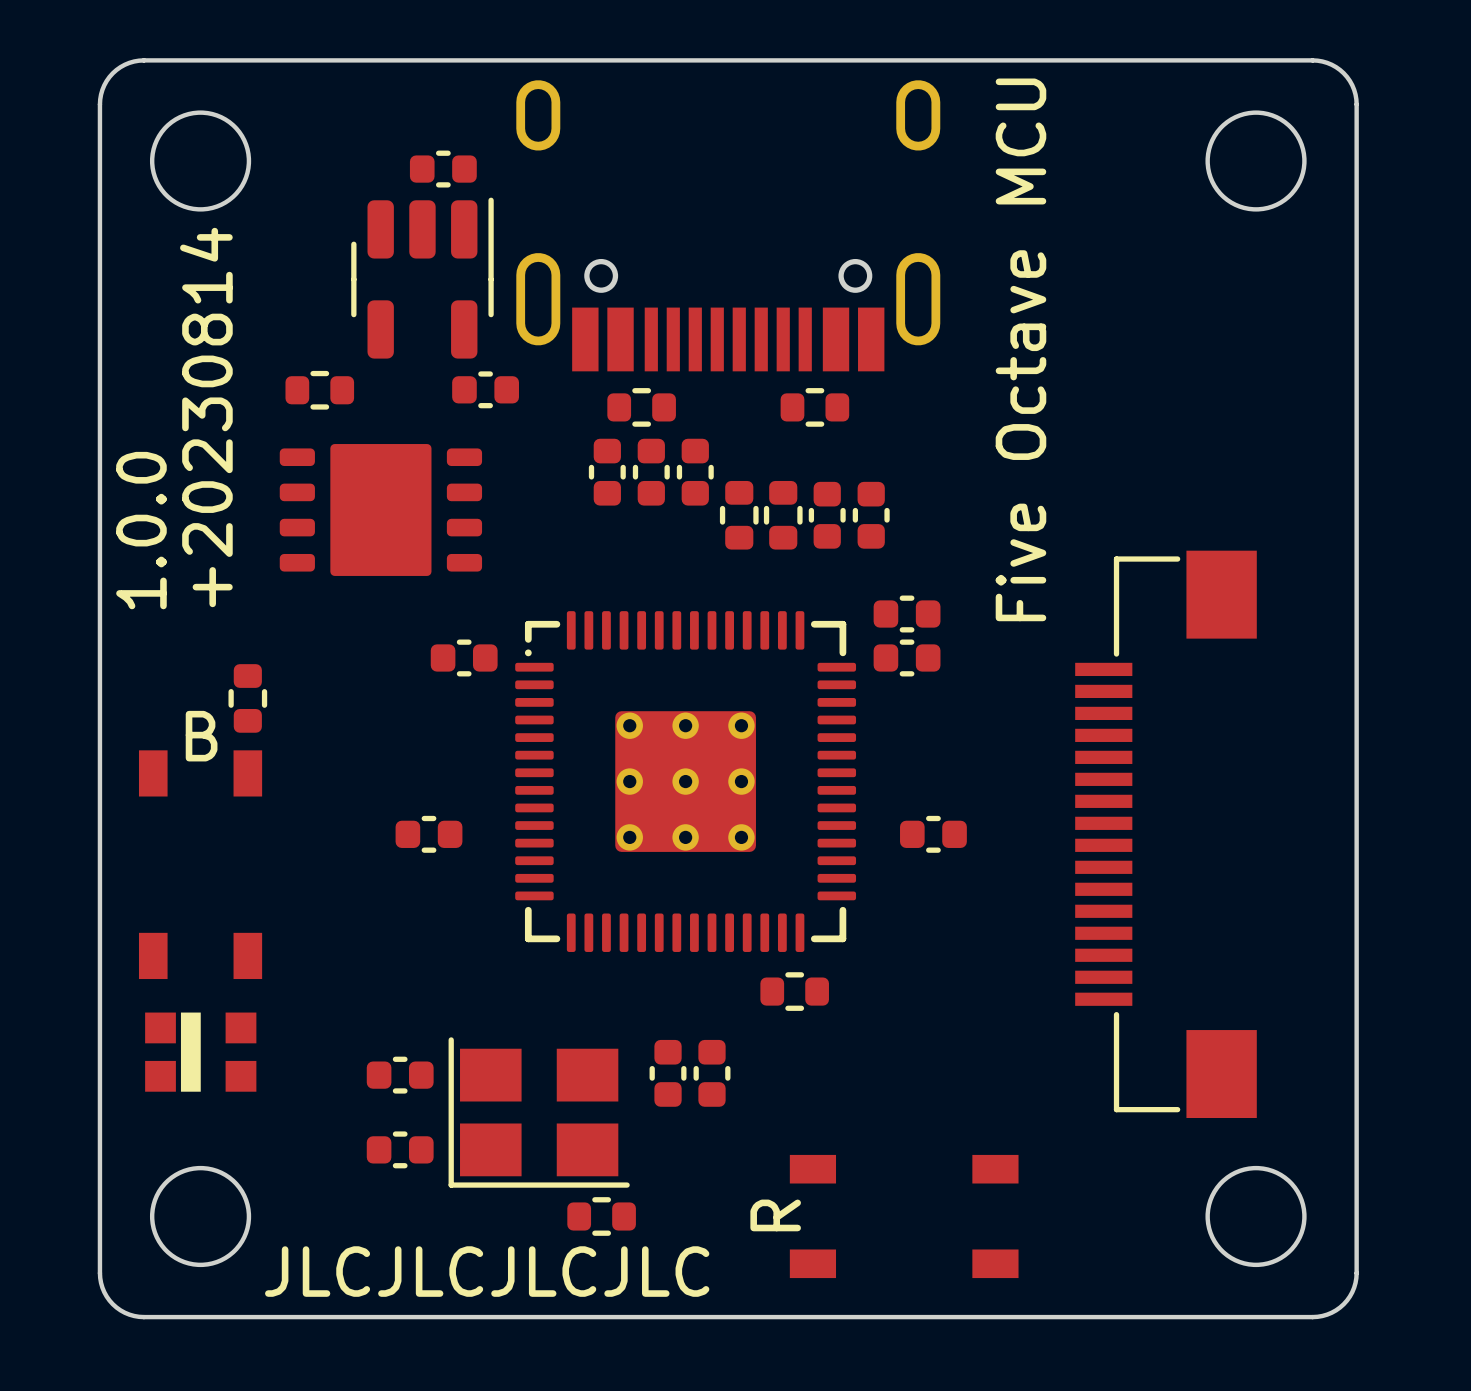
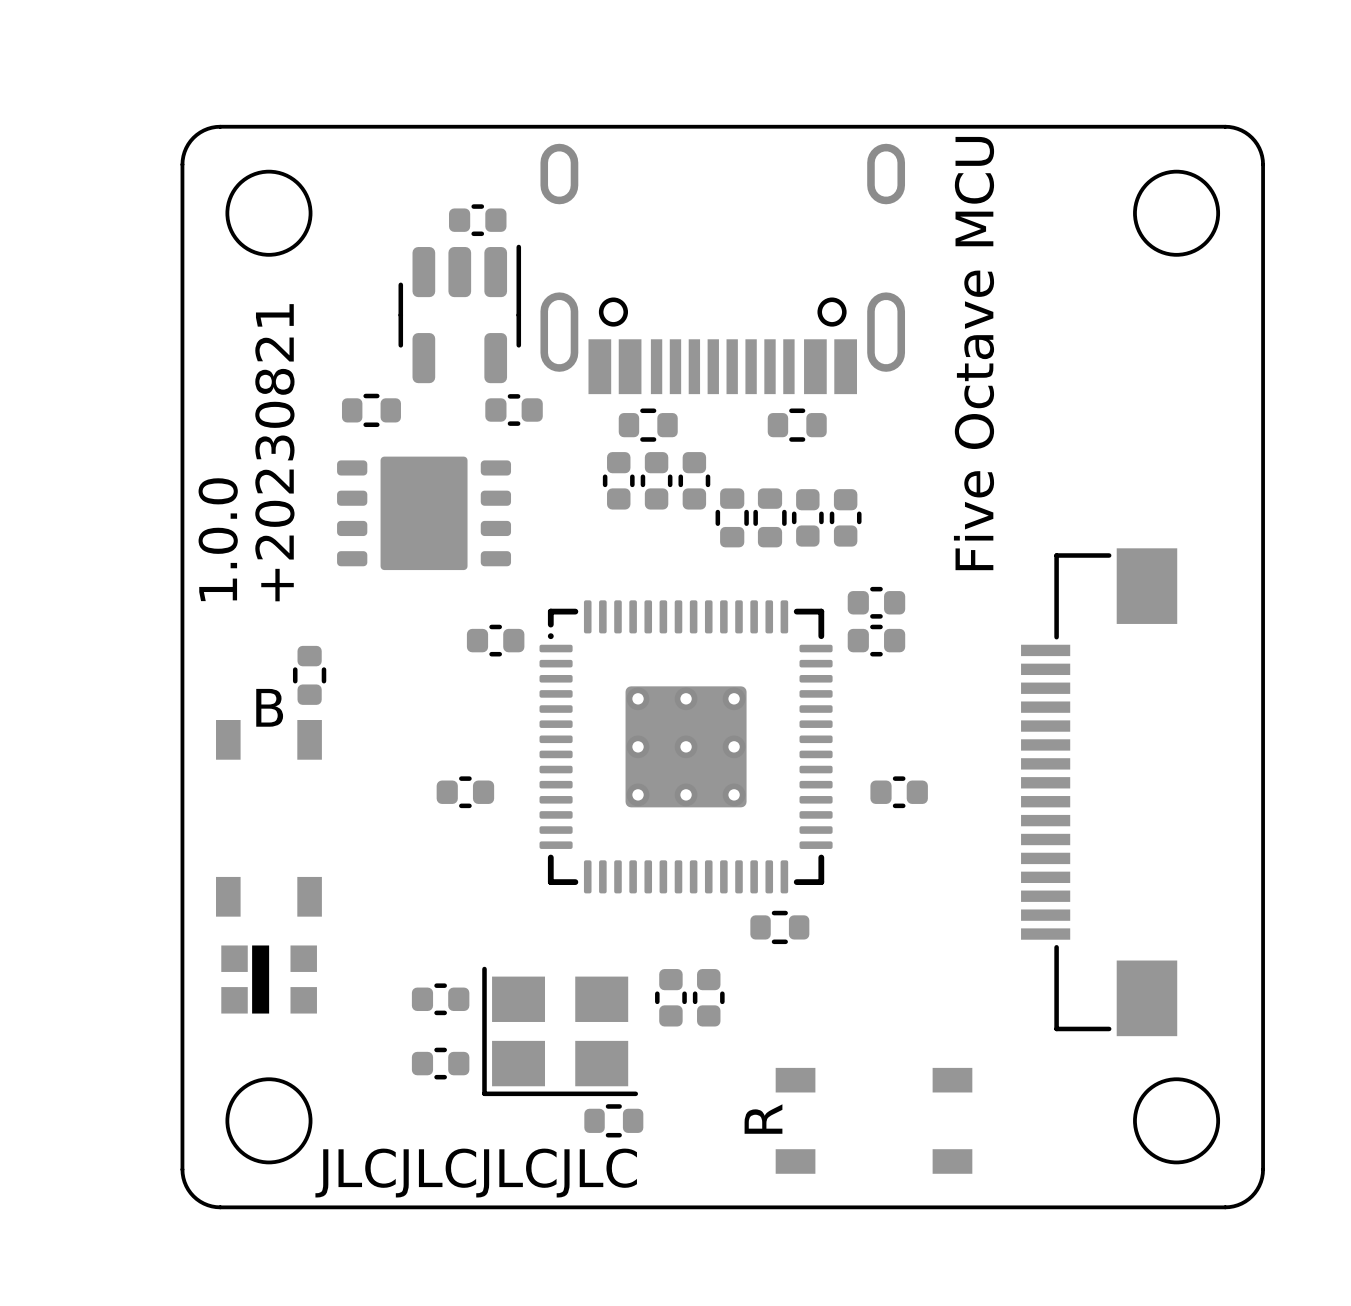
text: +20230814 (206, 417) -> +20230821 (274, 452)

